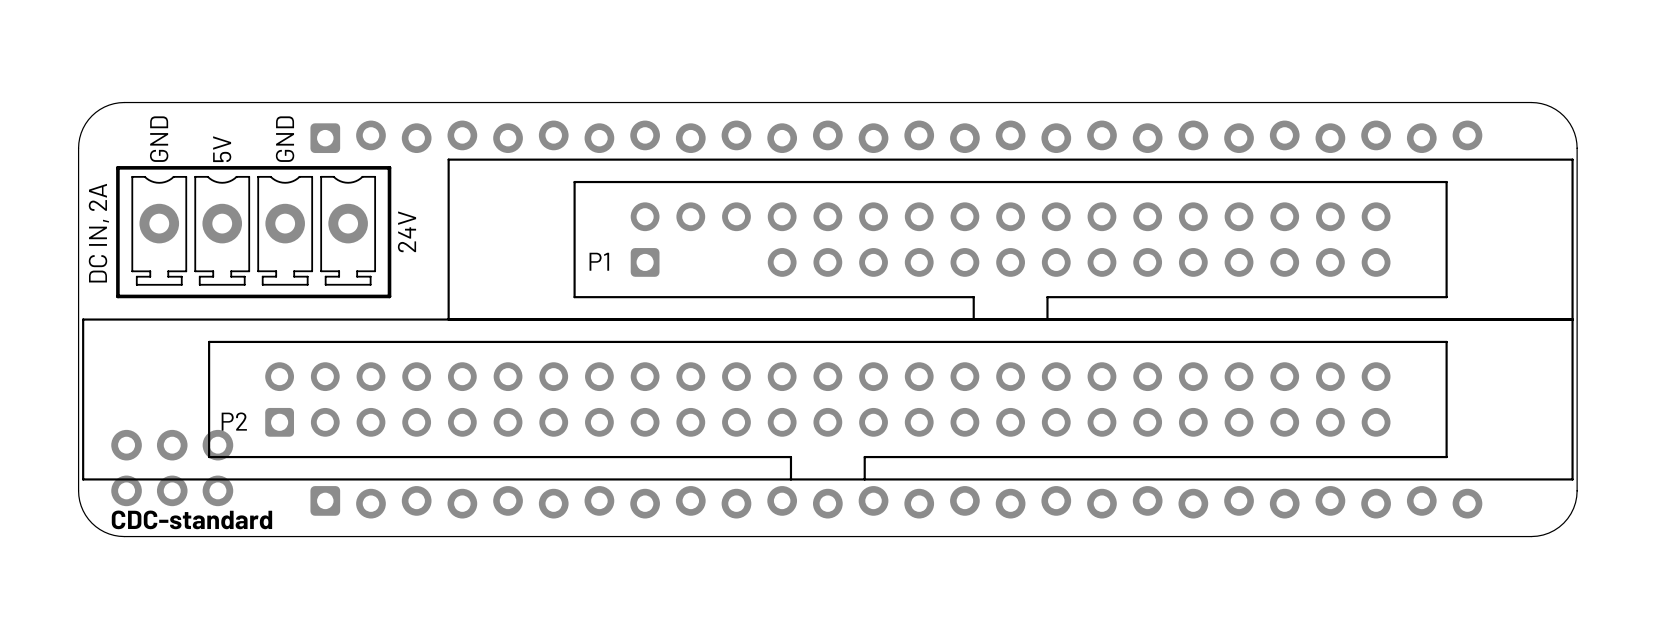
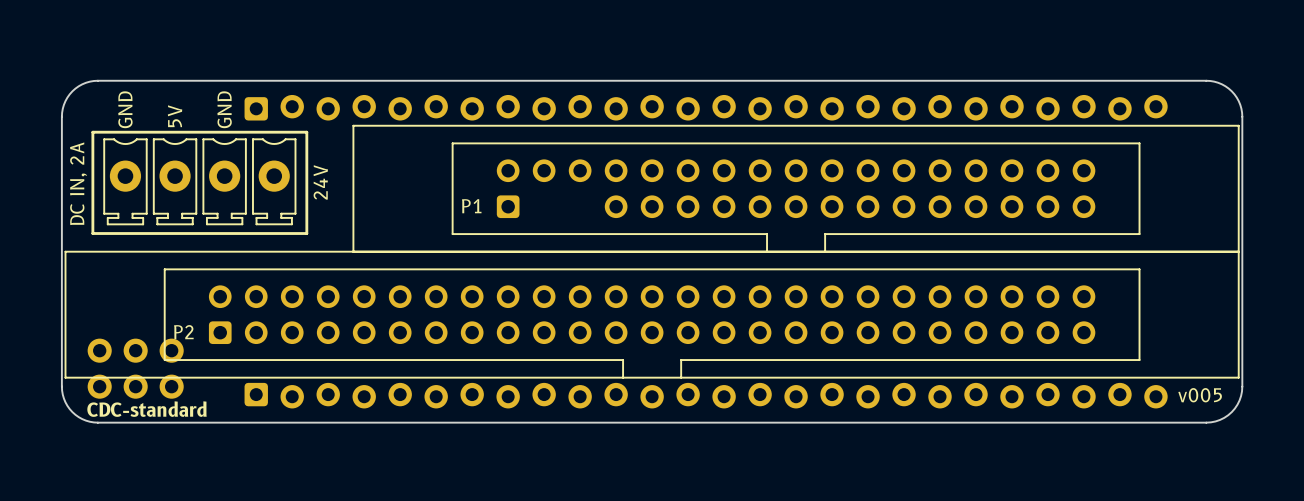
text: none -> v005 (1200, 395)

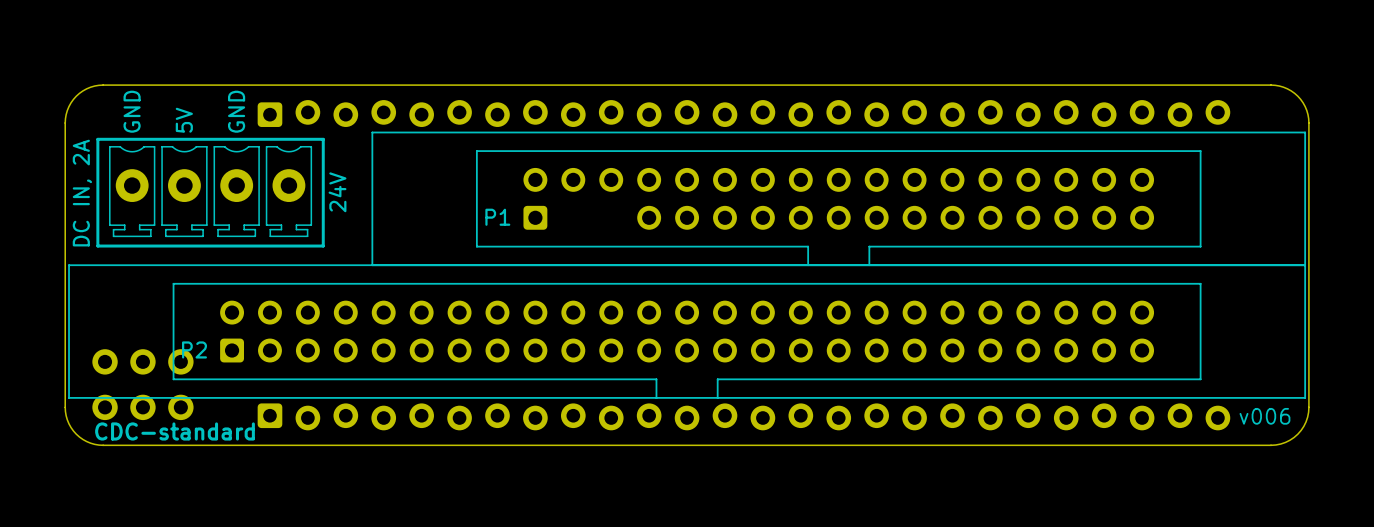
part: none -> (142, 361)
part: (135, 368) -> none
text: v005 (1200, 395) -> v006 (1264, 416)

